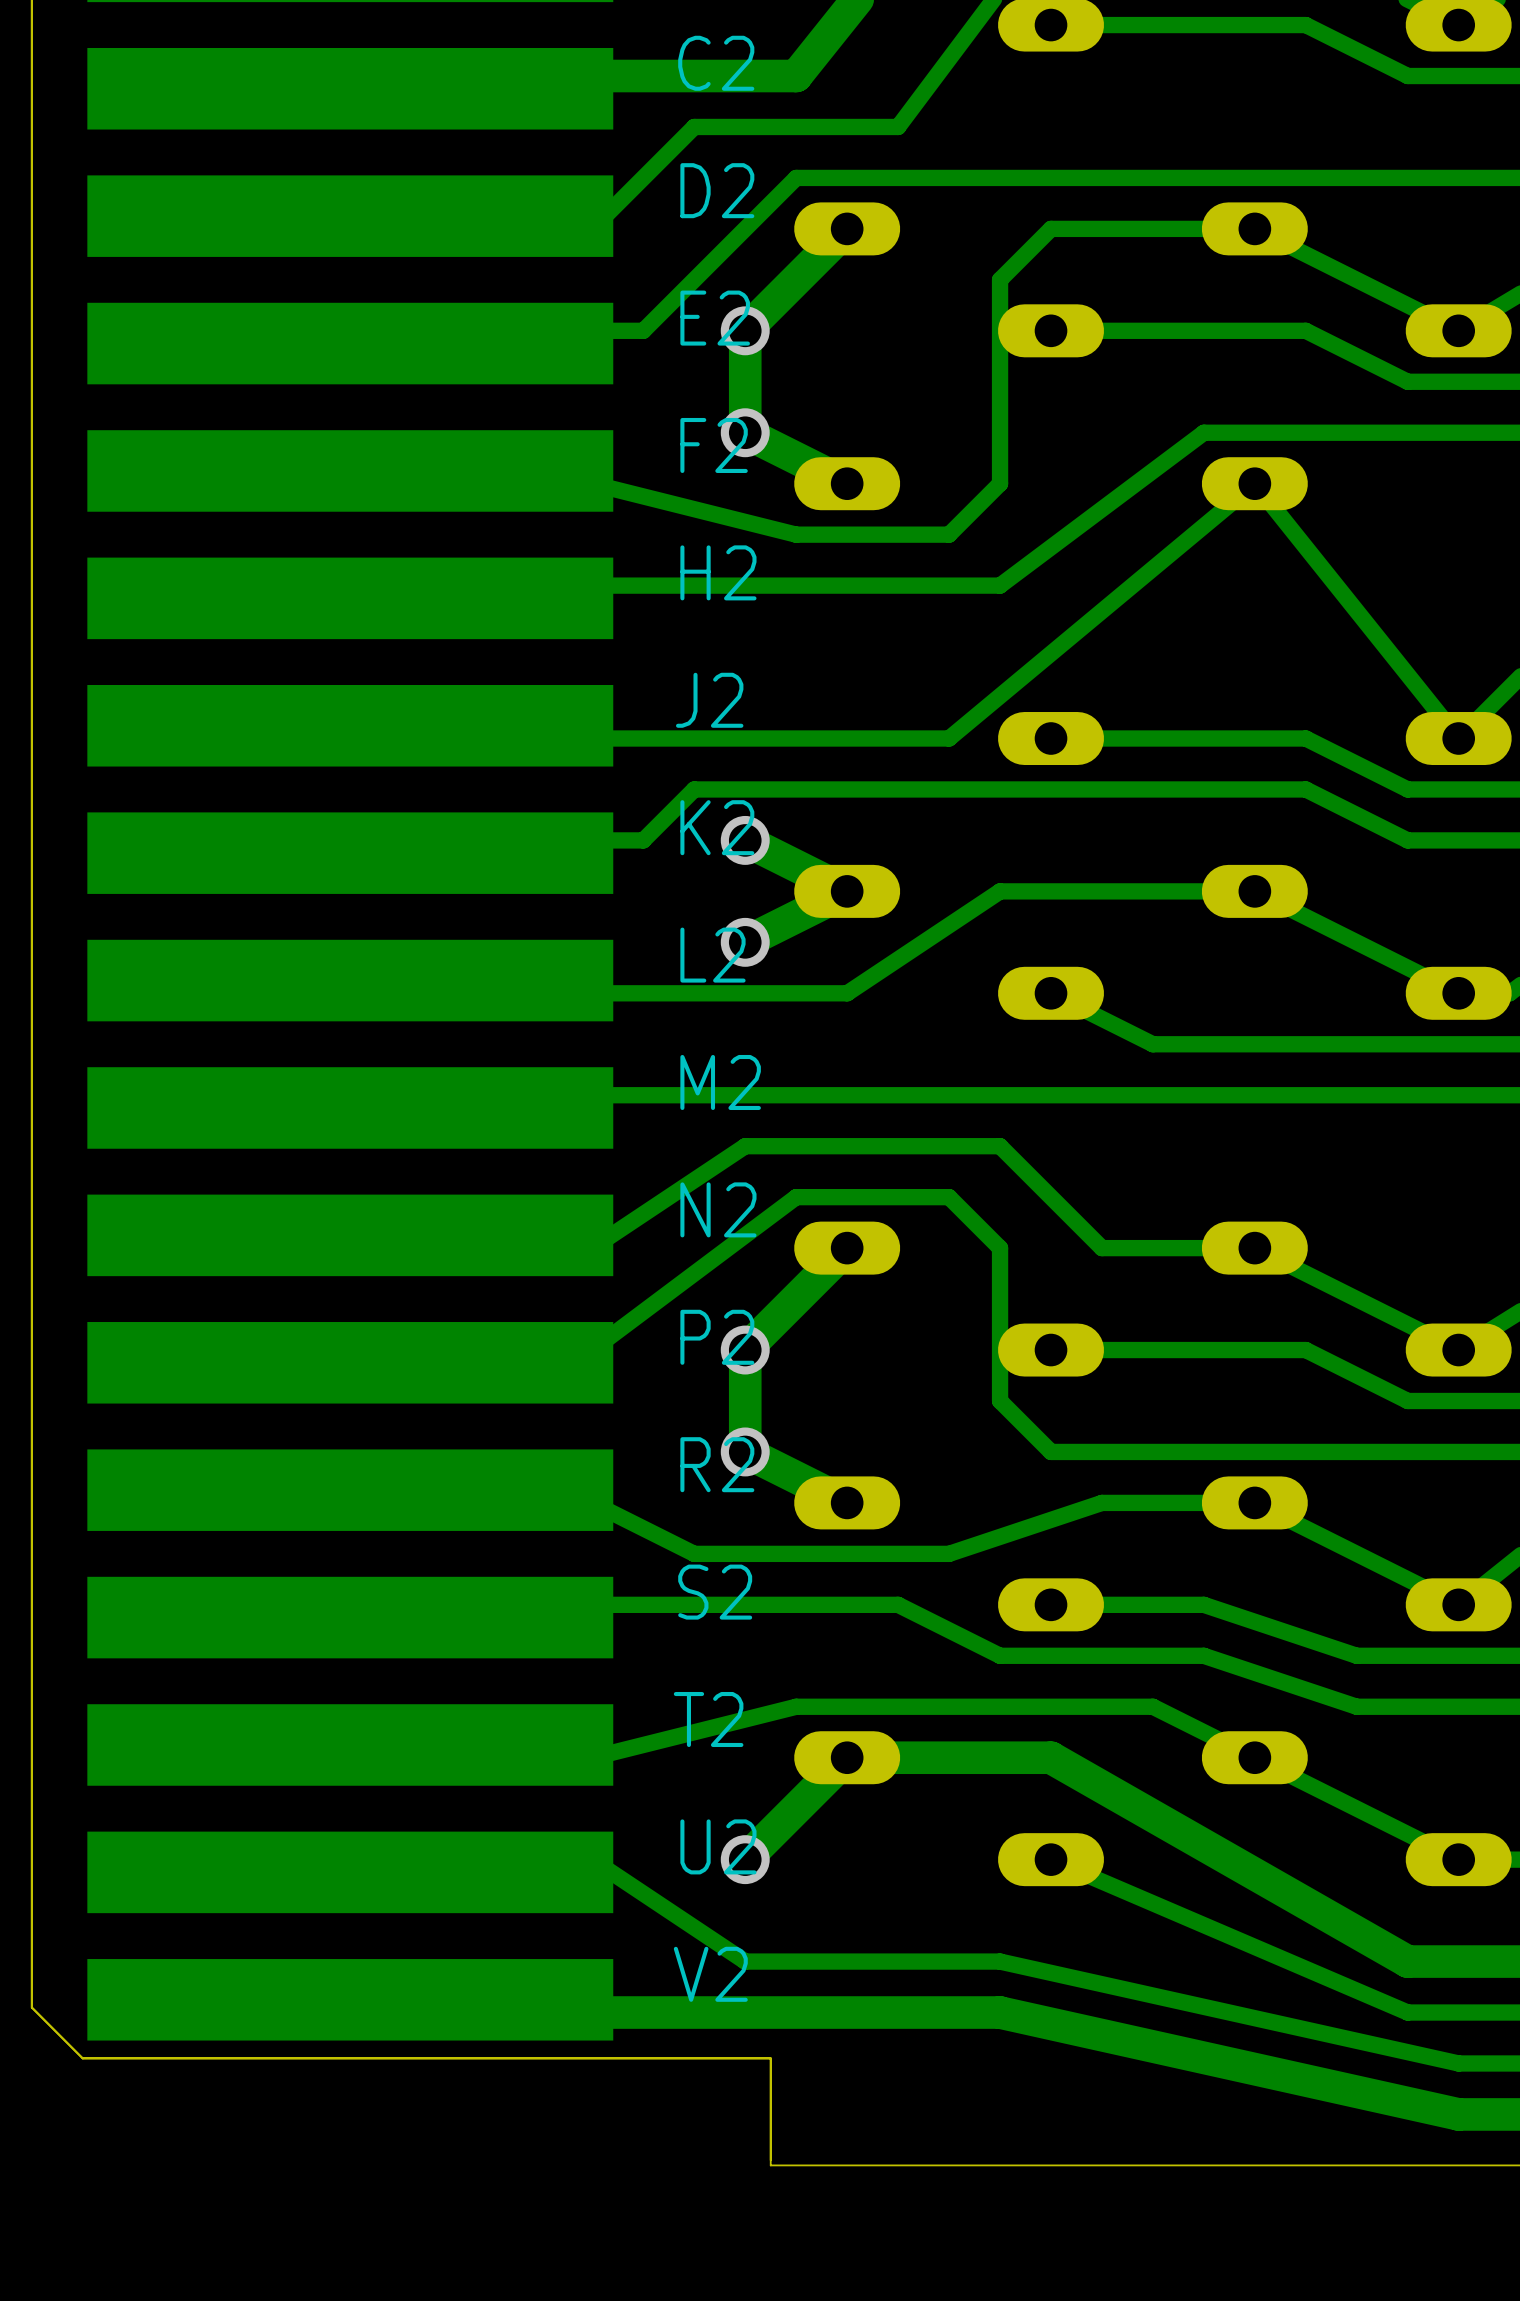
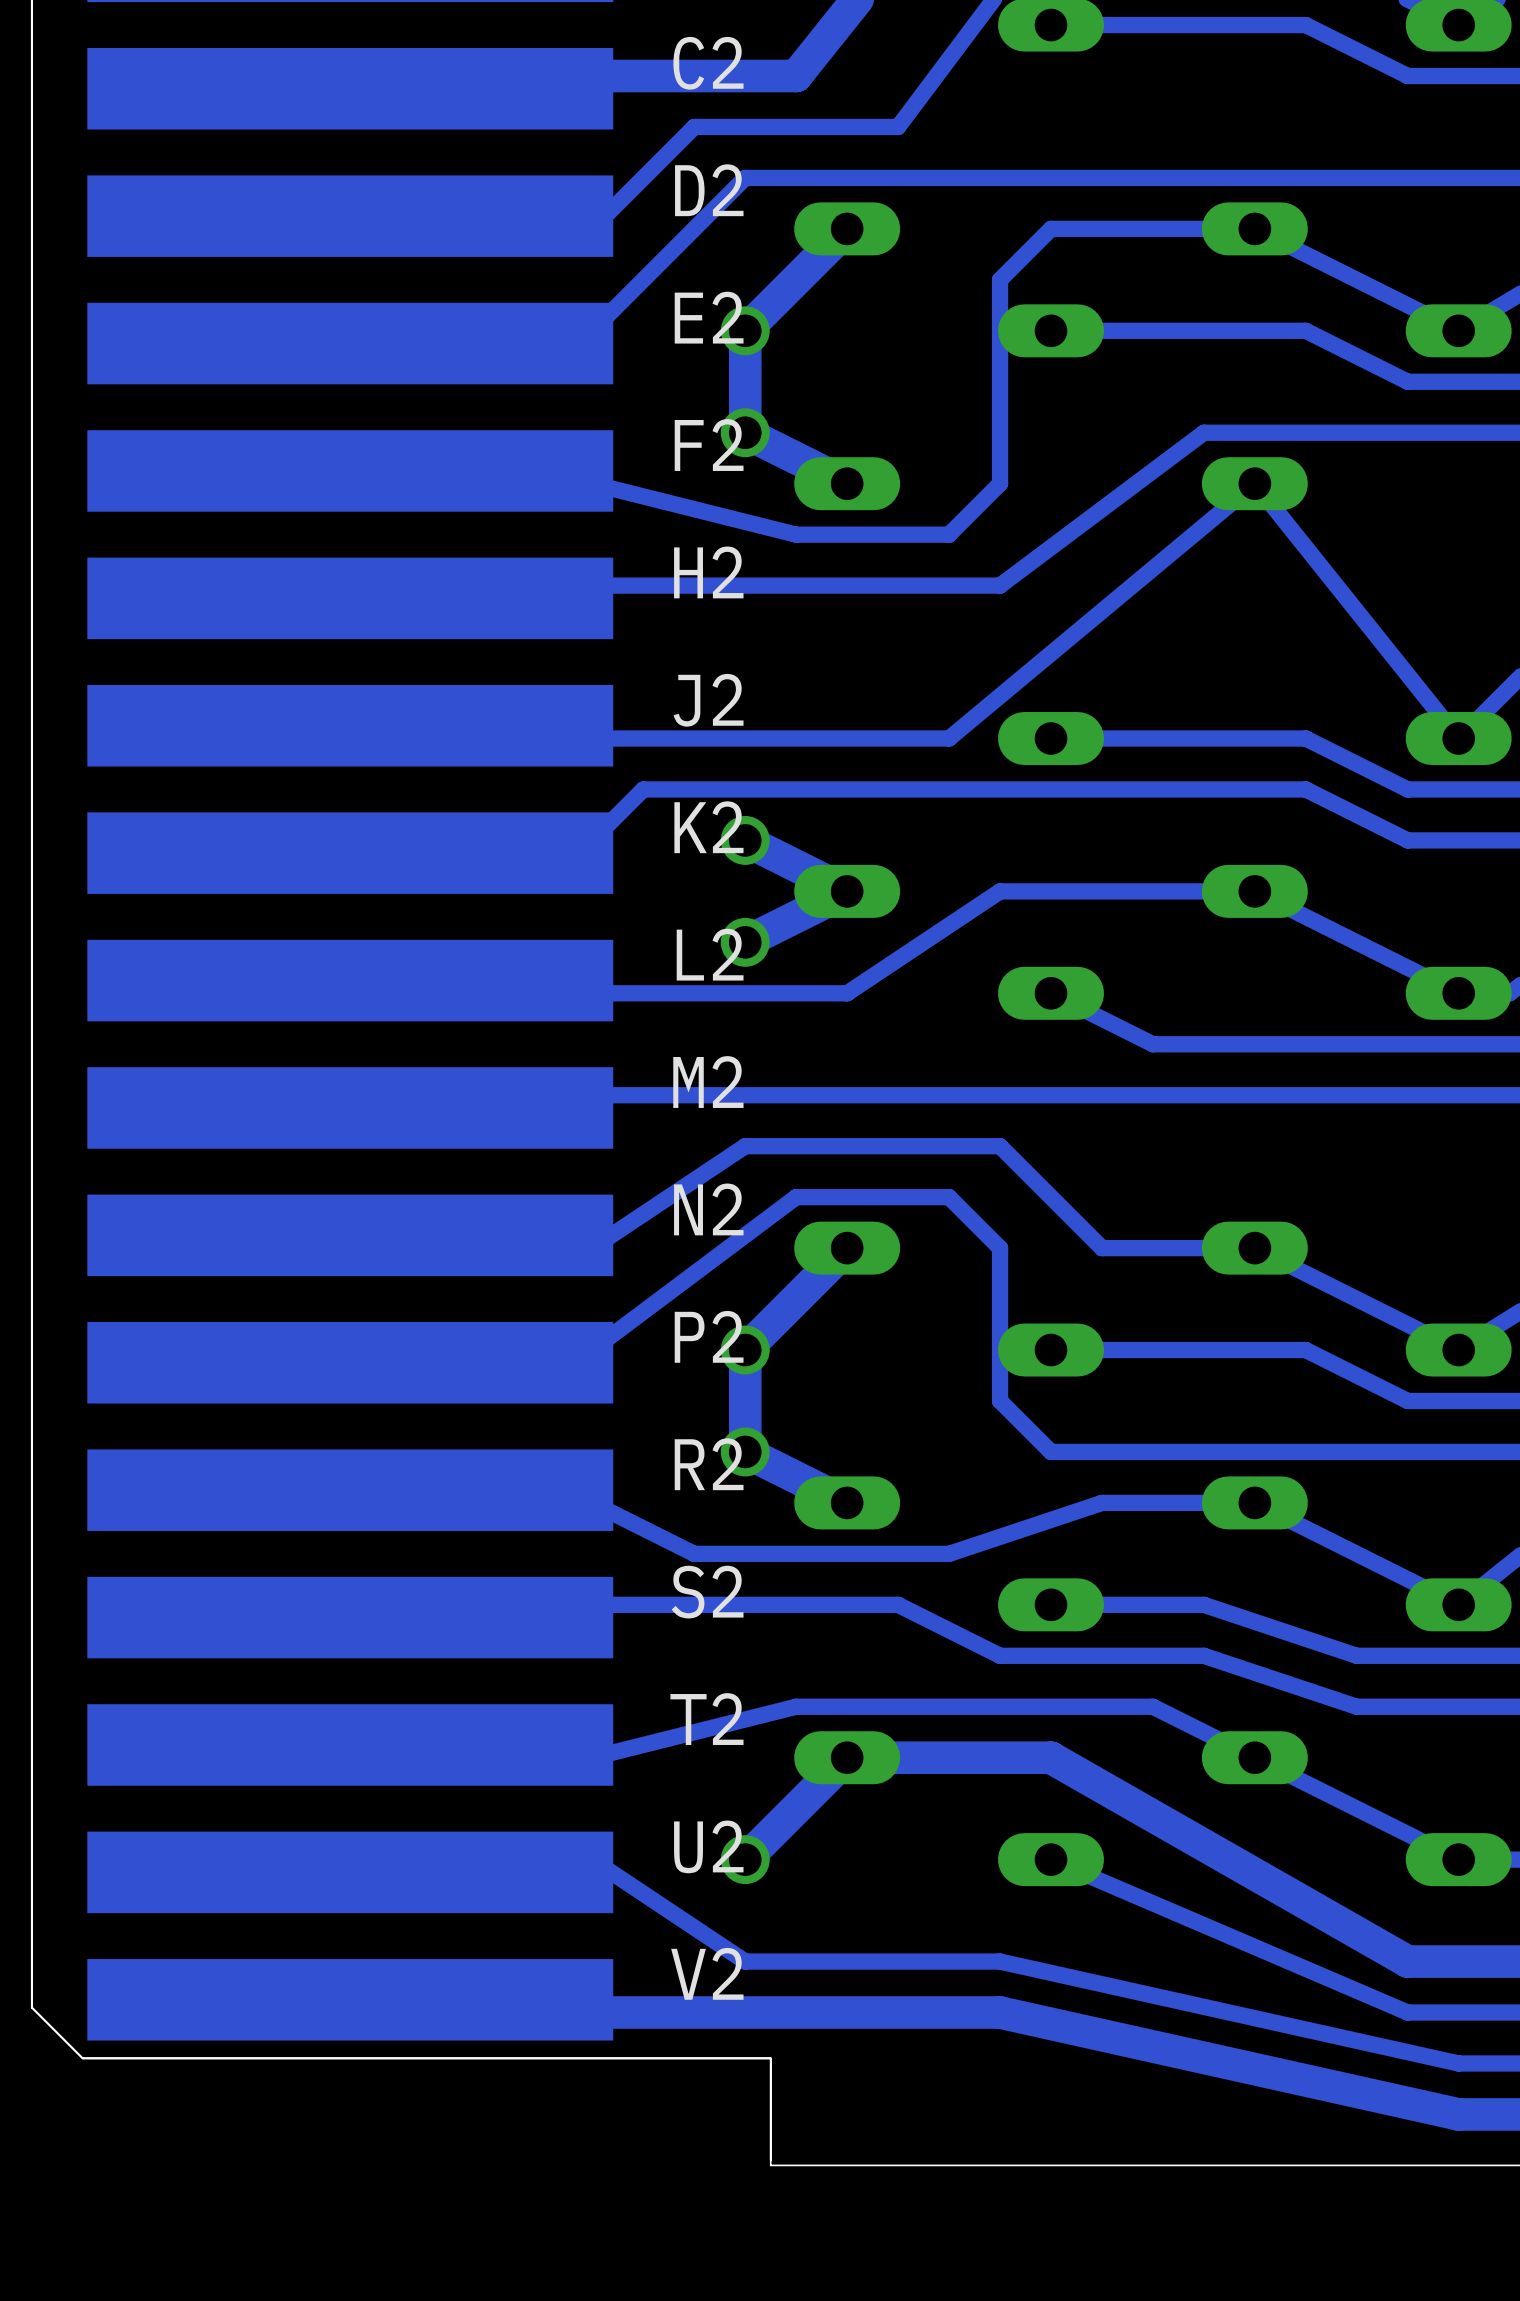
track: (796, 177) (643, 330) (592, 330) -> (796, 177) (745, 177) (592, 330)
track: (694, 789) (643, 840) (592, 840) -> (694, 789) (643, 789) (592, 840)

